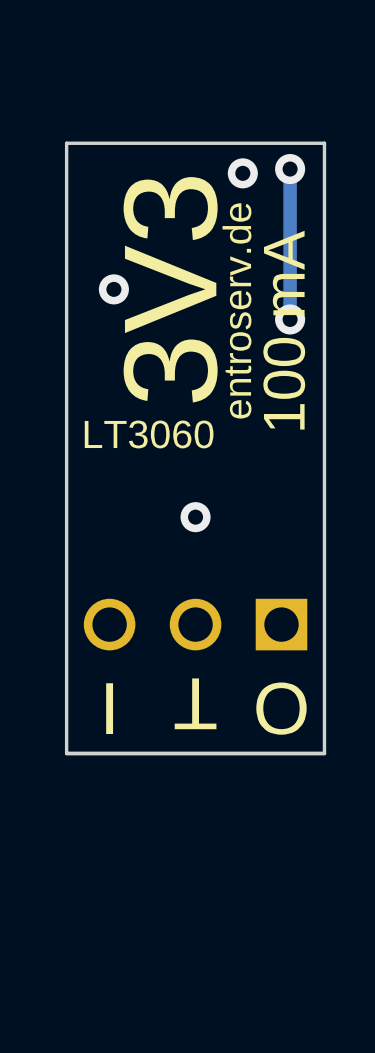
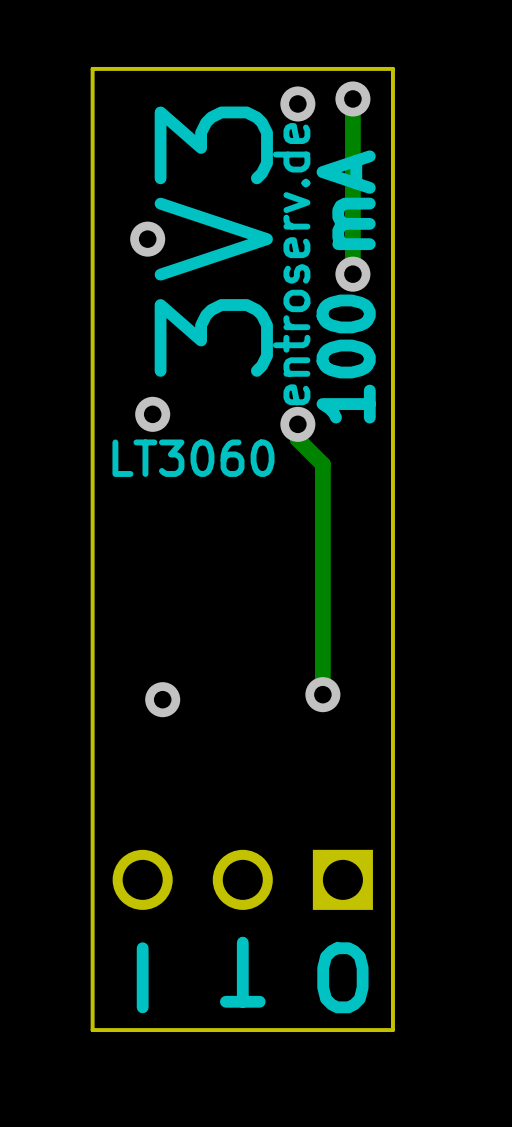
text position: LT3060 (149, 434) -> LT3060 (193, 458)
via: none -> (152, 414)
track: none -> (297, 424) (297, 439) (322, 464) (322, 694)
via: none -> (297, 424)
via: (195, 517) -> none
part position: (195, 624) -> (242, 879)
via: none -> (322, 694)
via: none -> (162, 699)
text position: T (195, 703) -> T (242, 972)
text position: I (109, 708) -> I (142, 977)
text position: O (281, 708) -> O (342, 977)
board edge: (324, 753) (66, 753) -> (392, 779) (392, 1030) (92, 1030) (92, 779)

